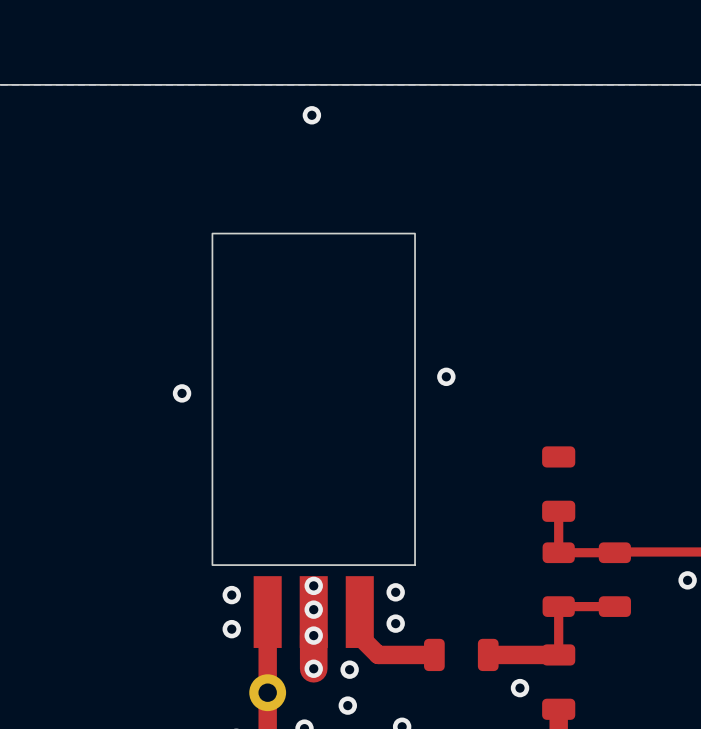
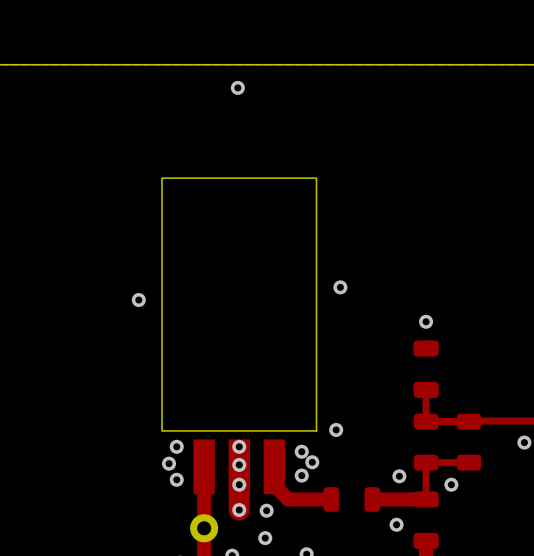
via: none -> (426, 321)
via: none -> (336, 429)
via: none -> (176, 446)
via: (231, 595) -> none
via: none -> (312, 462)
via: none -> (169, 463)
via: none -> (399, 476)
via: none -> (451, 484)

